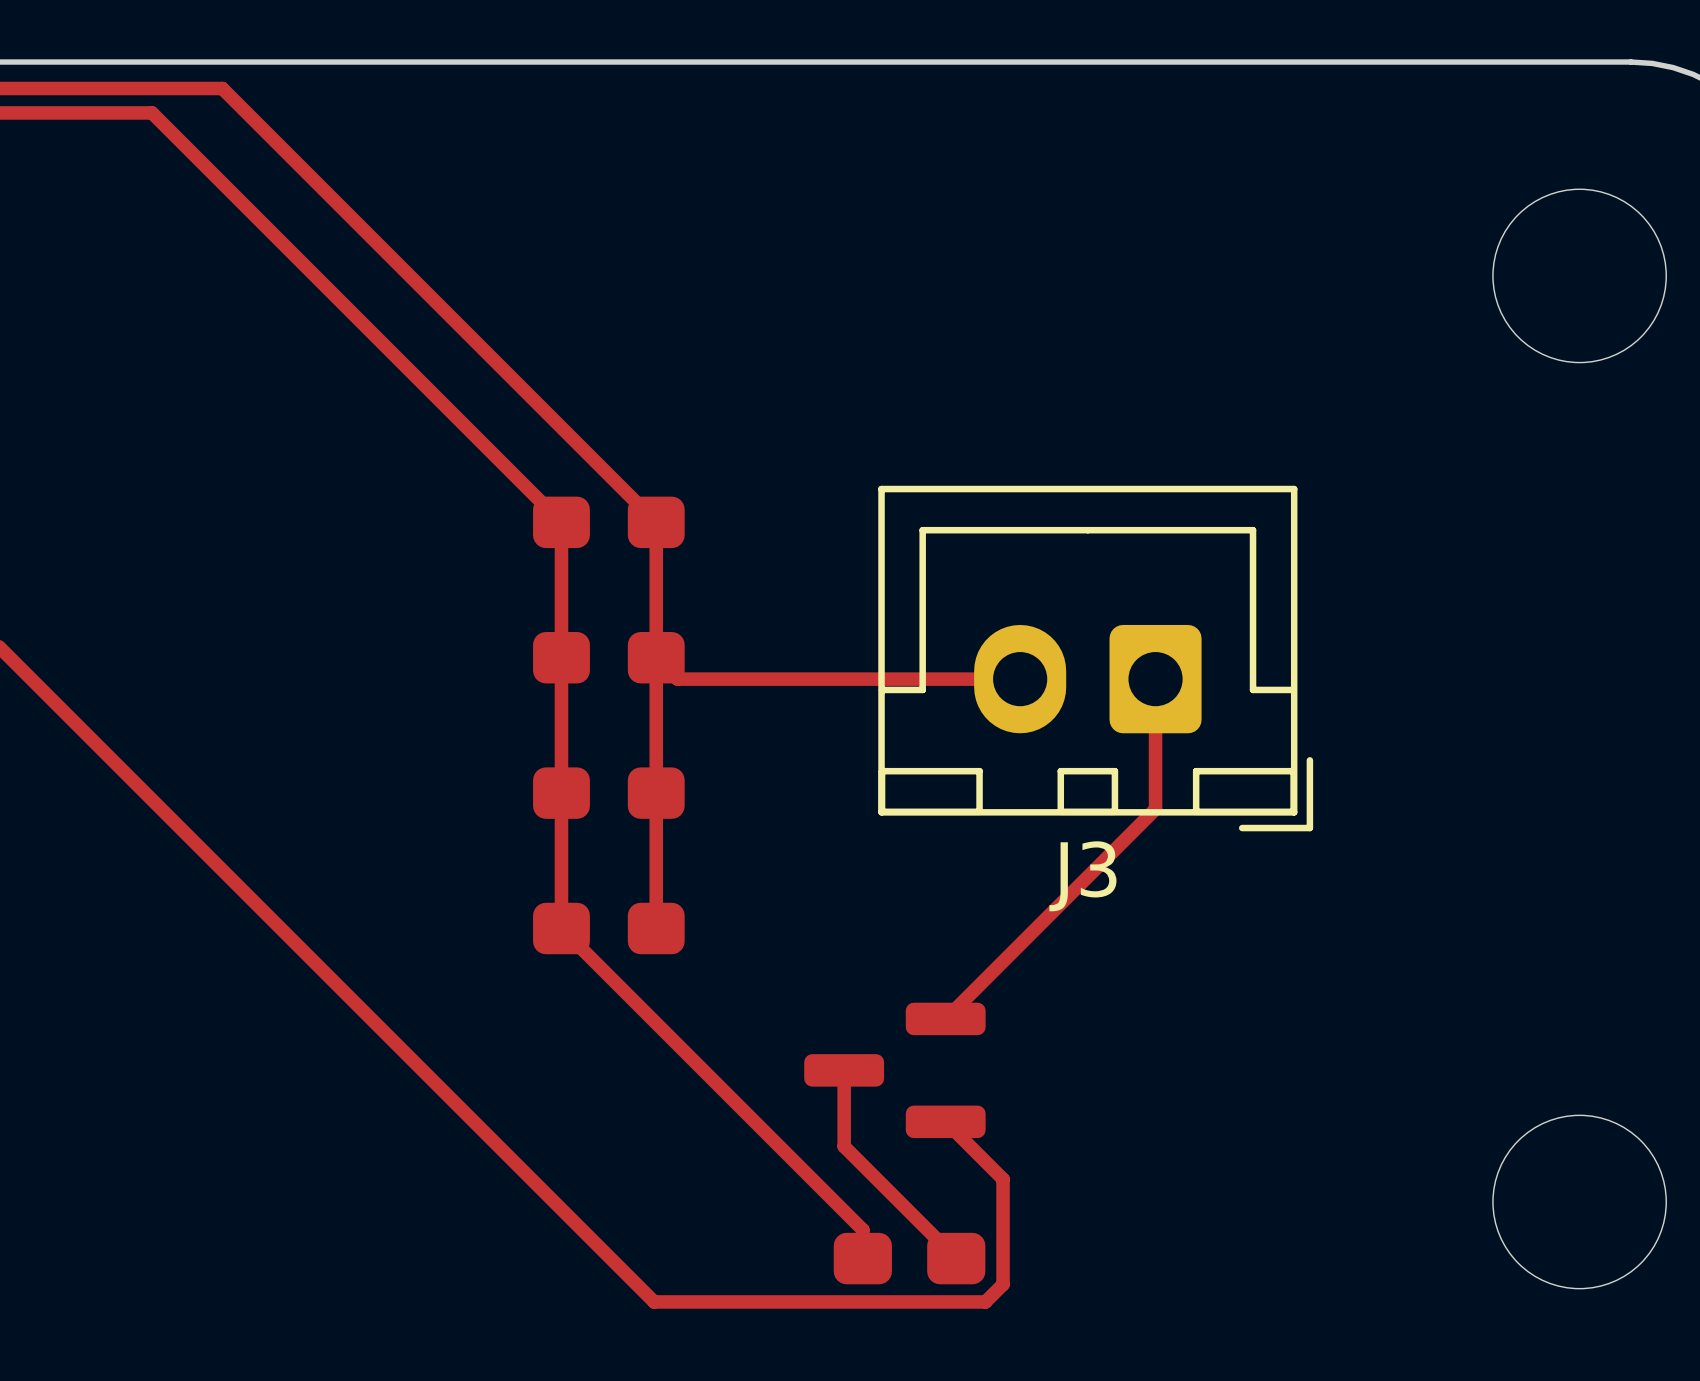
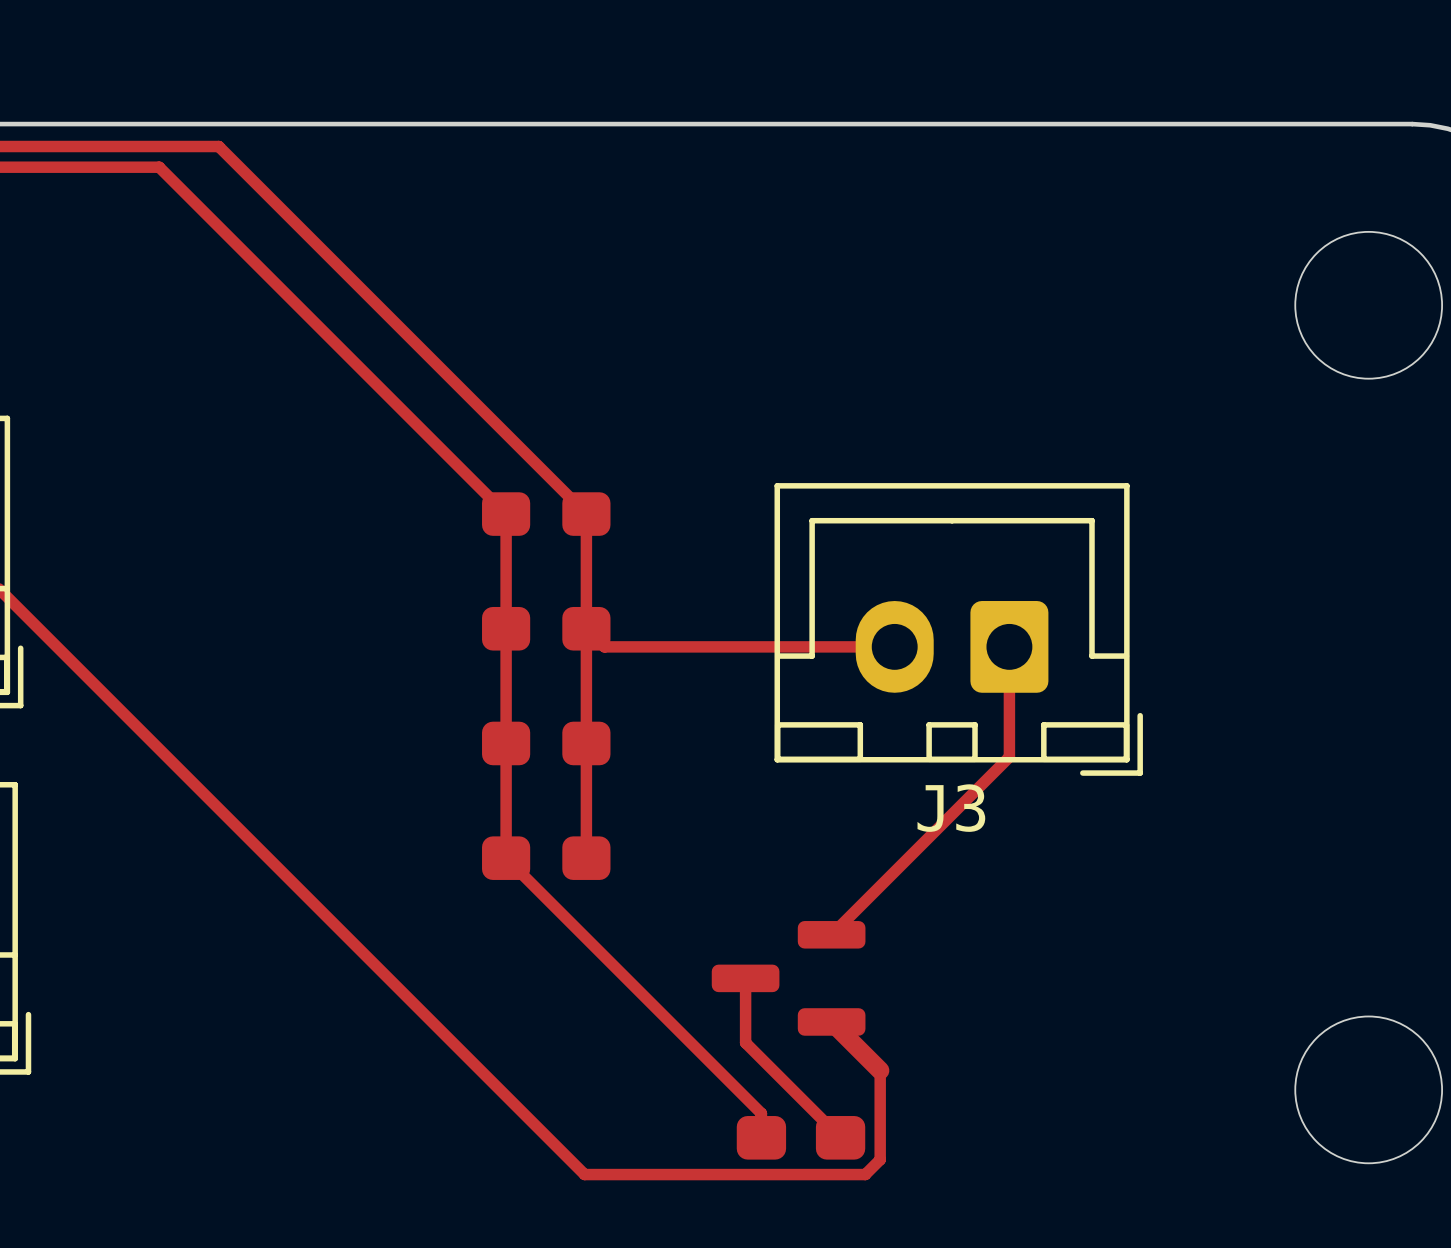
top track width: thin (945, 1121) (1003, 1179) -> thick (831, 1021) (880, 1070)

